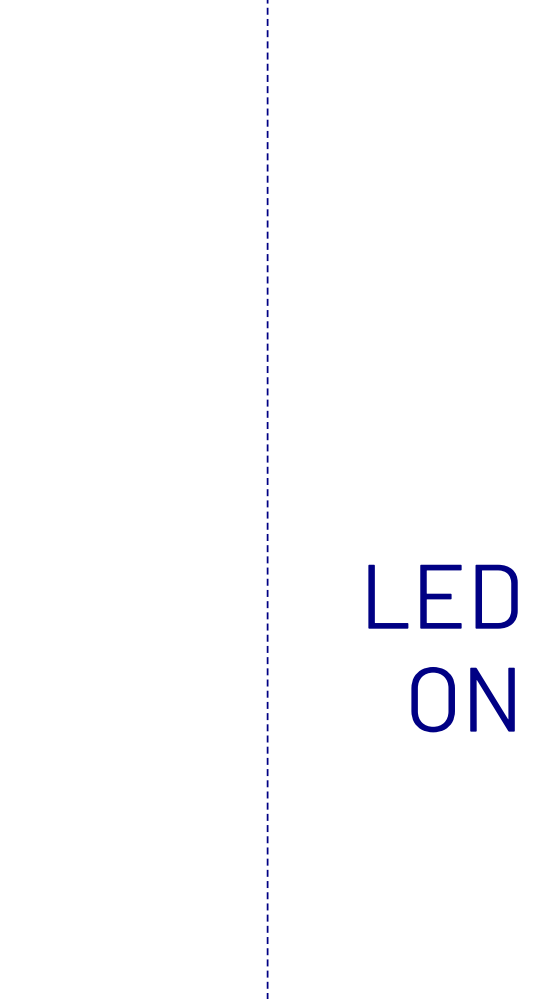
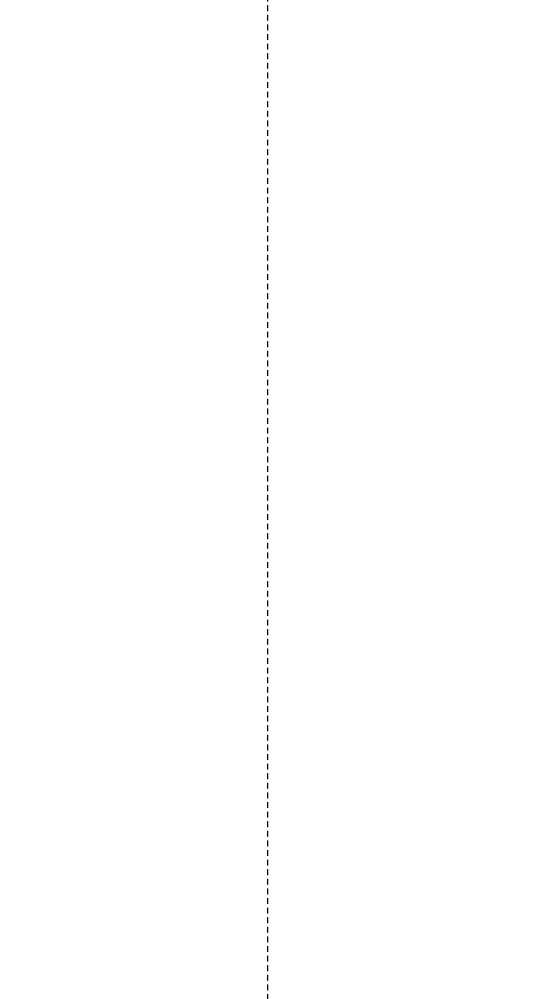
text: LED (443, 596) -> none
text: ON (463, 699) -> none

